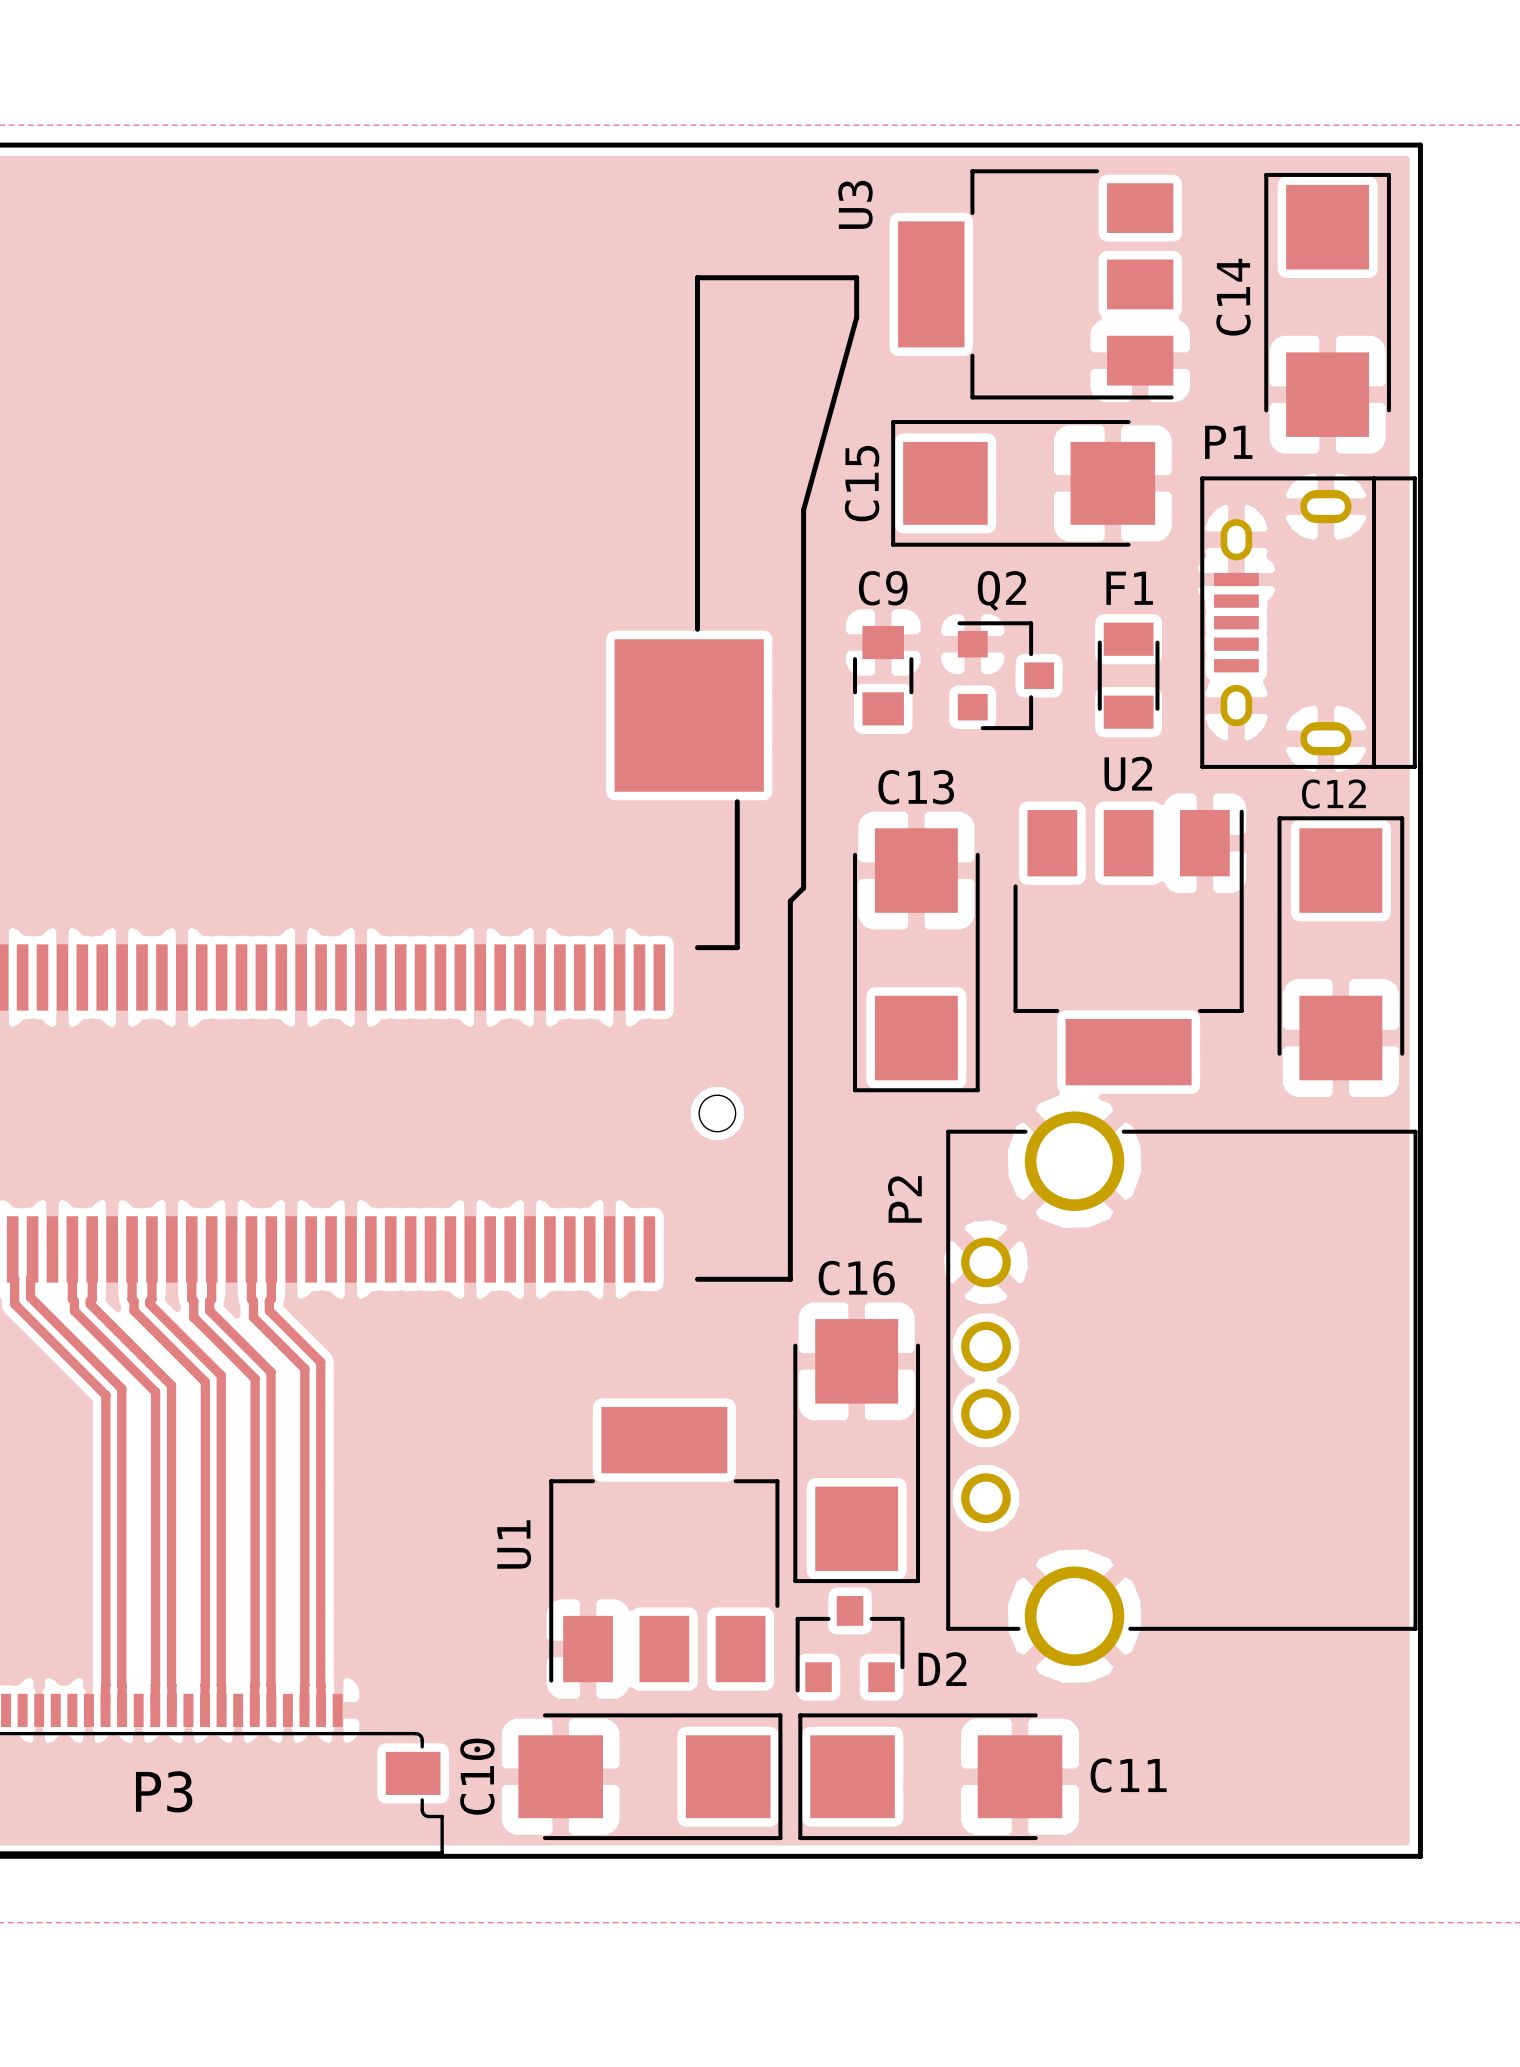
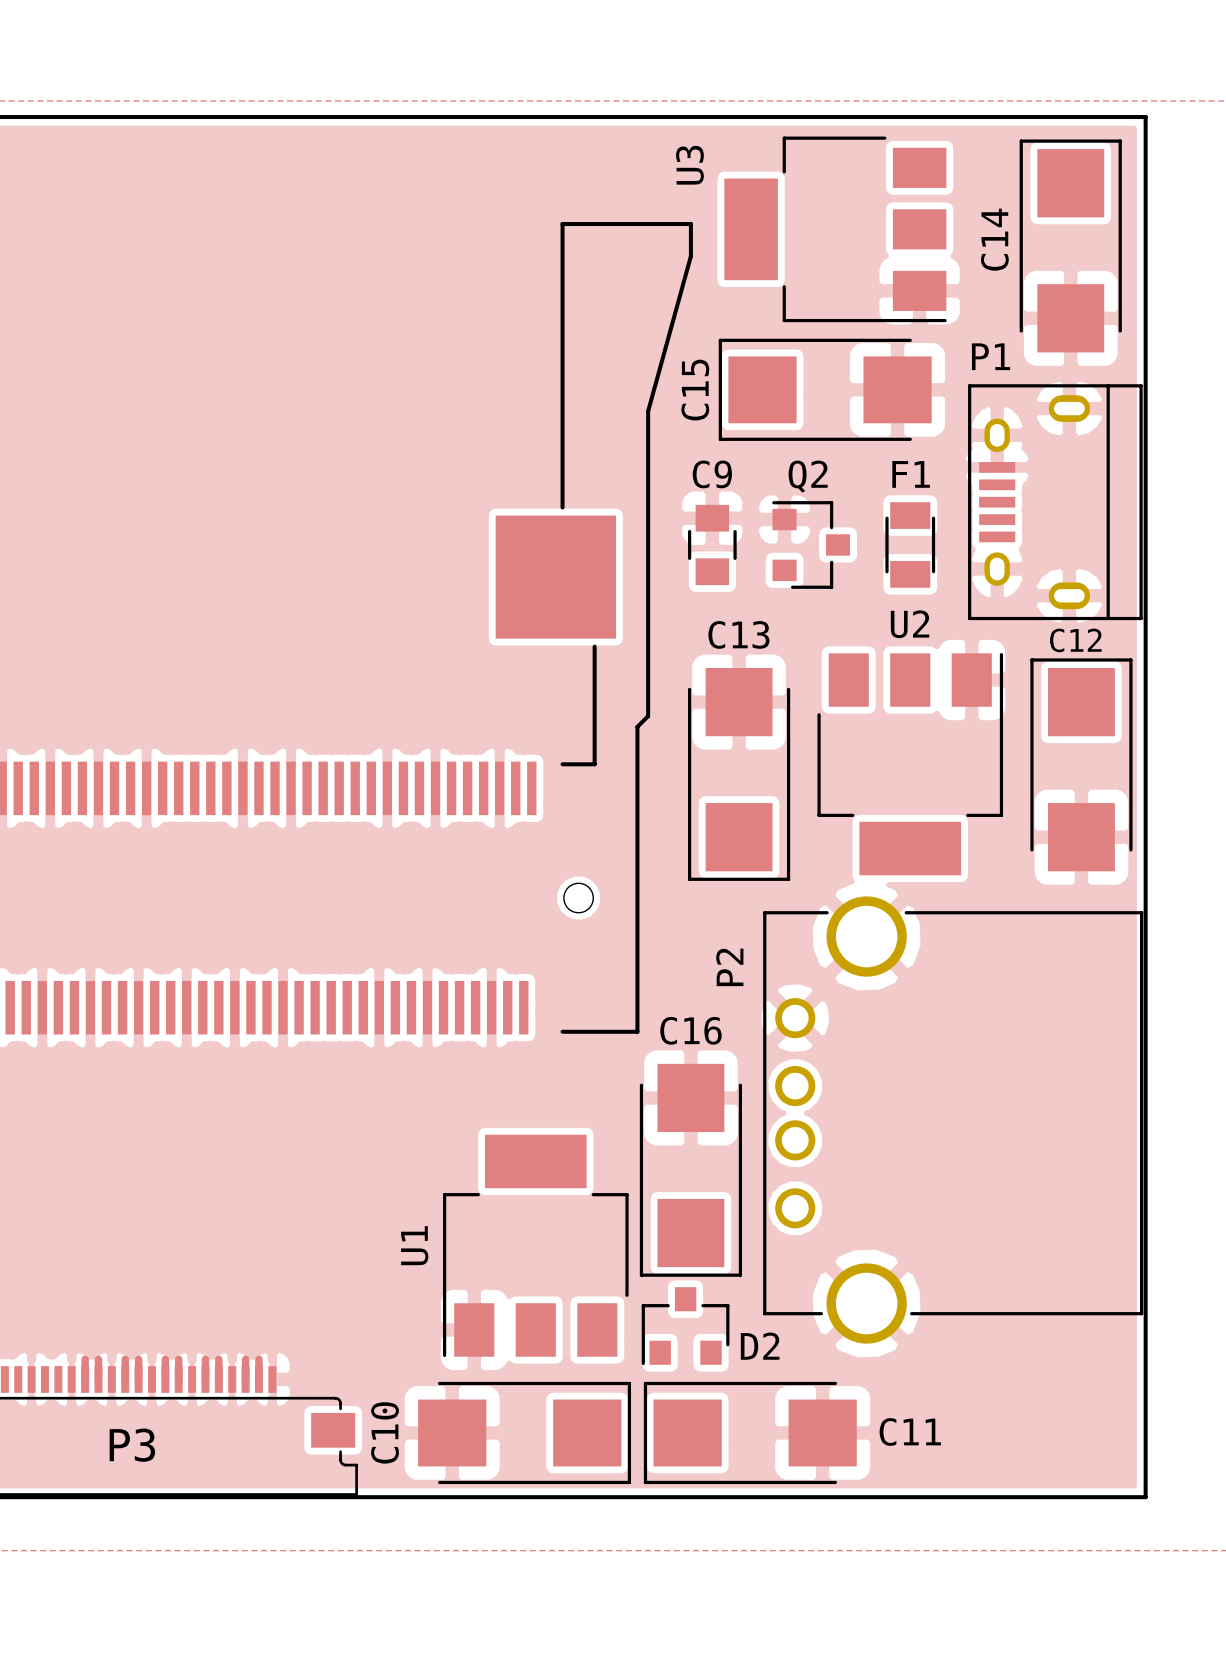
track: (12, 1249) (14, 1304) (105, 1395) (105, 1685) -> none
track: (32, 1249) (30, 1297) (121, 1388) (121, 1685) -> none
track: (72, 1249) (72, 1299) (74, 1301) (74, 1310) (155, 1392) (155, 1685) -> none
track: (92, 1249) (92, 1299) (90, 1304) (171, 1385) (171, 1685) -> none
track: (132, 1249) (132, 1299) (134, 1301) (134, 1310) (205, 1382) (205, 1685) -> none
track: (151, 1249) (151, 1299) (149, 1304) (221, 1375) (221, 1685) -> none
track: (191, 1249) (193, 1317) (255, 1378) (255, 1685) -> none
track: (211, 1249) (211, 1299) (209, 1301) (209, 1310) (271, 1372) (271, 1685) -> none
track: (251, 1249) (253, 1317) (304, 1368) (304, 1685) -> none
track: (271, 1249) (271, 1299) (269, 1301) (269, 1310) (320, 1362) (320, 1685) -> none

